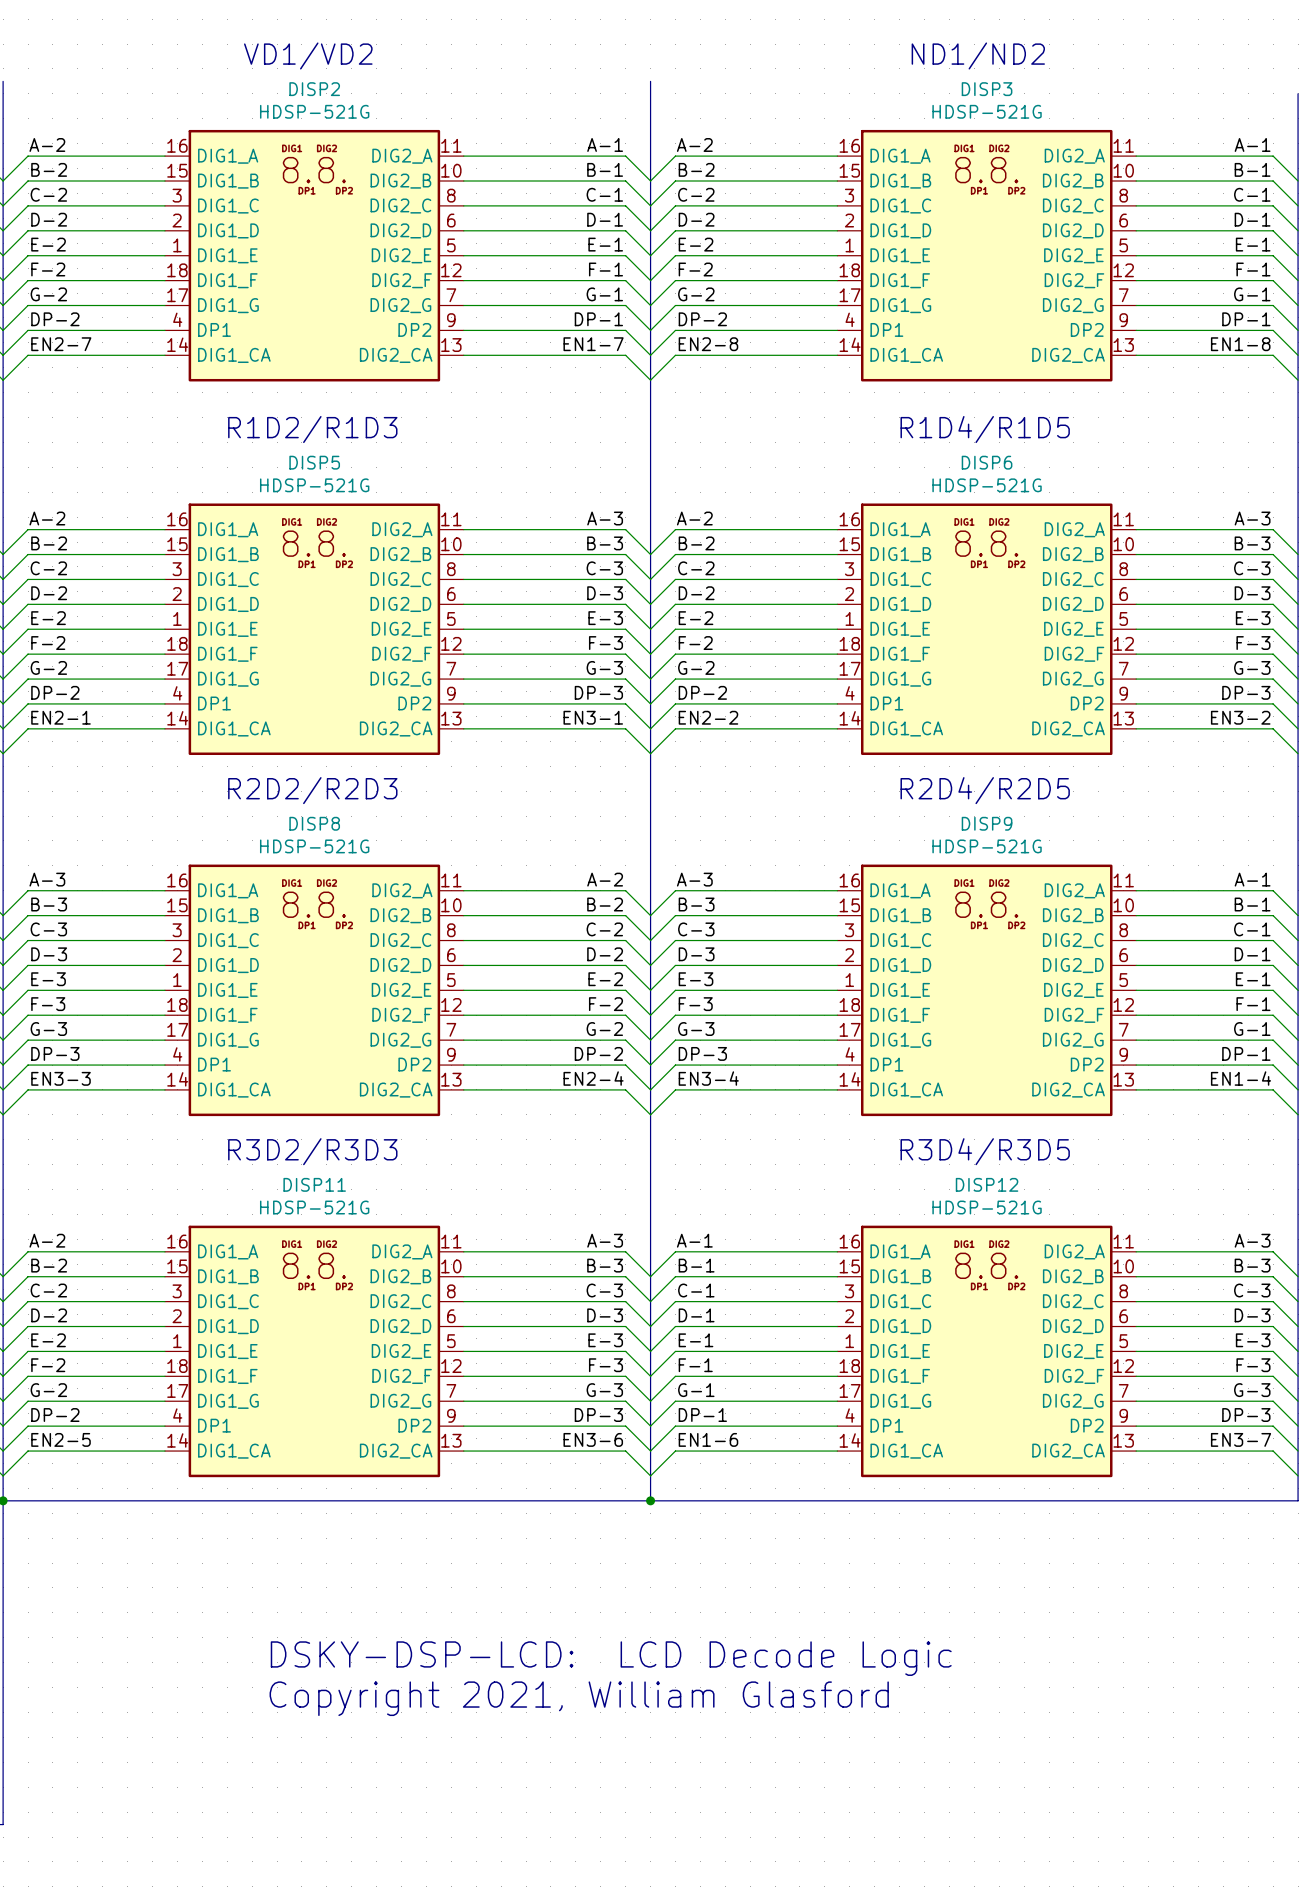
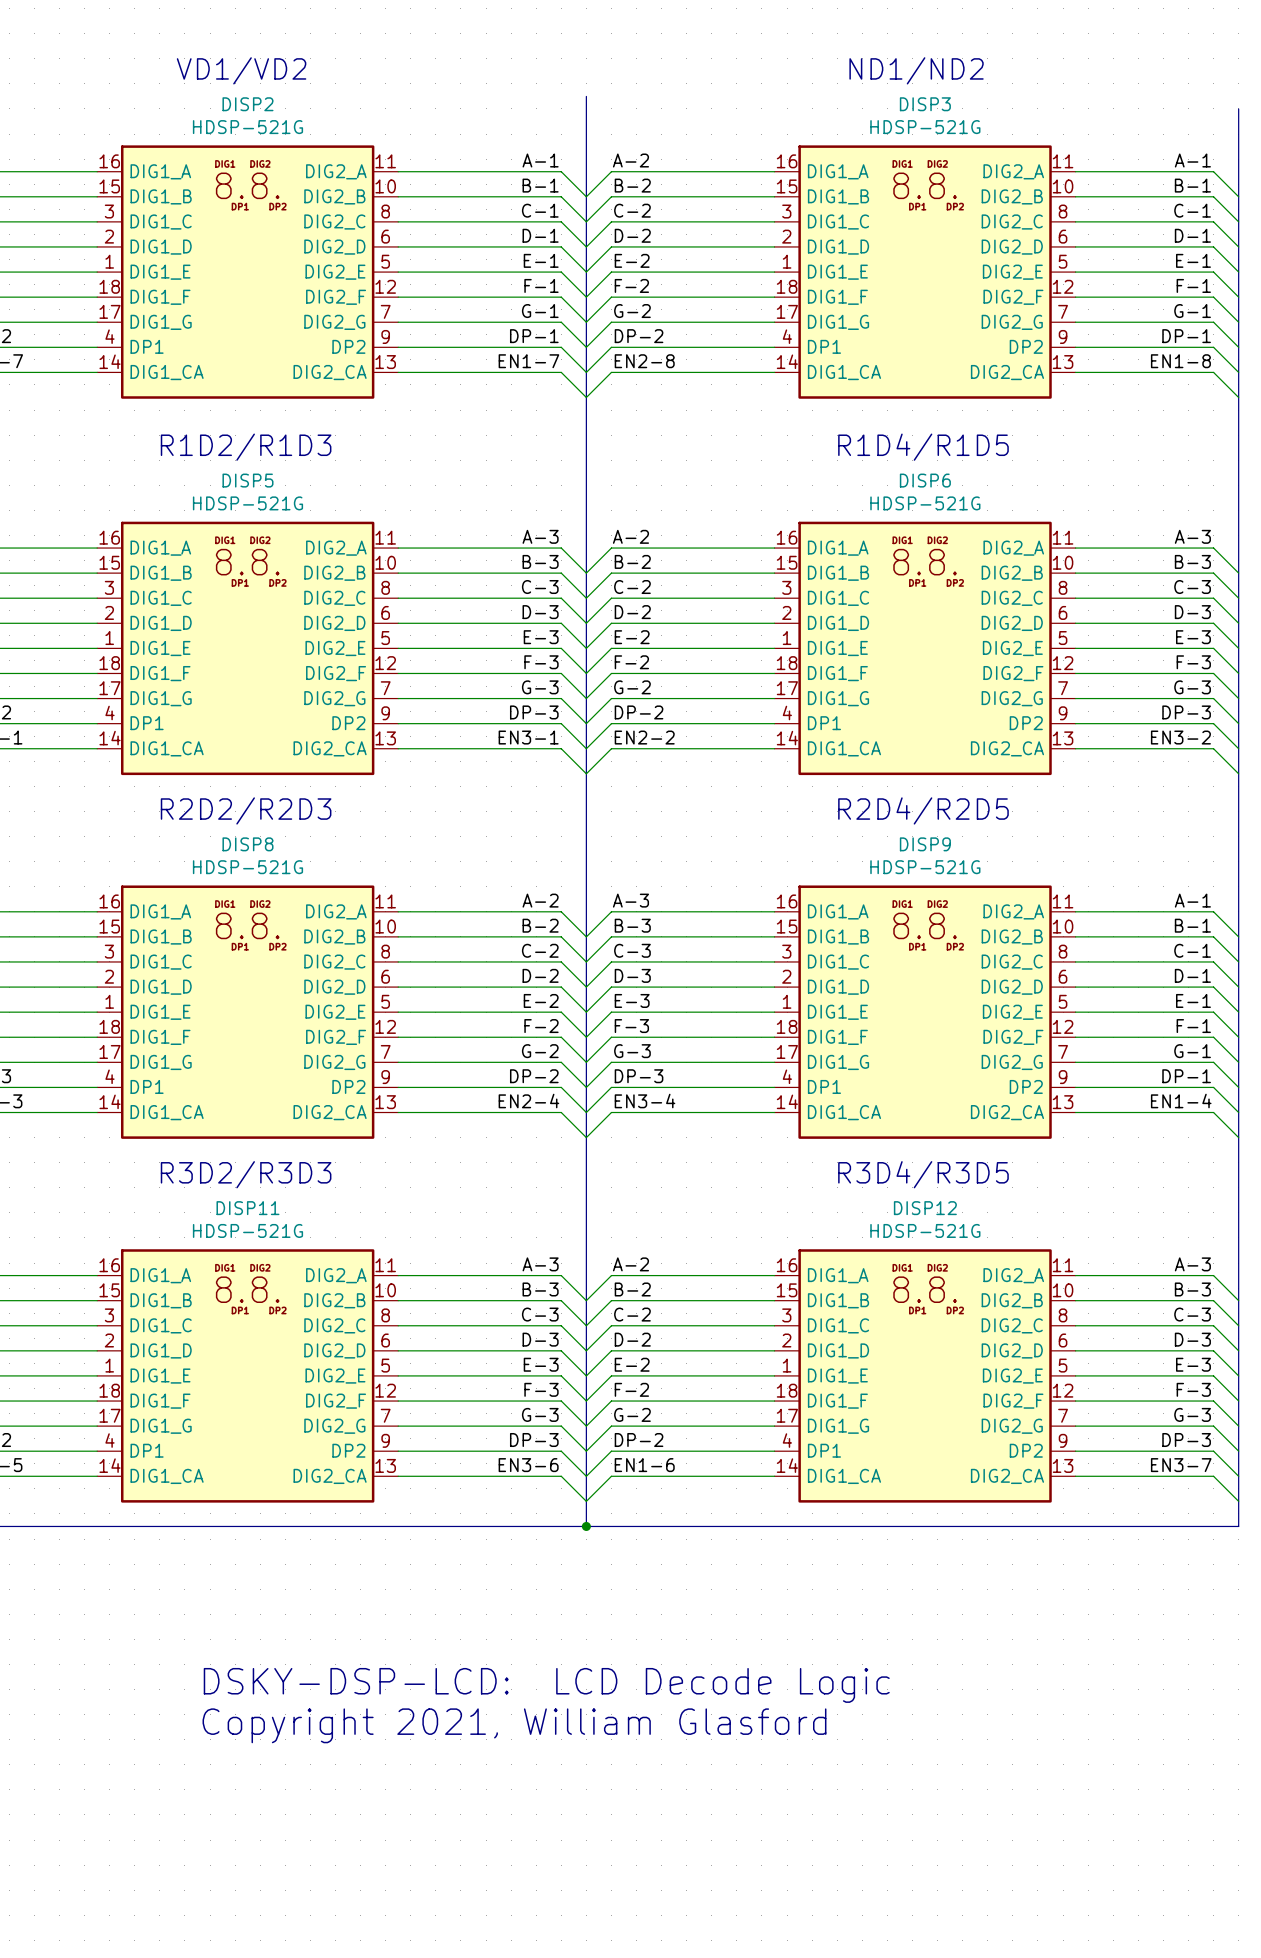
label: A-1 (694, 1240) -> A-2 (630, 1264)
label: B-1 (696, 1265) -> B-2 (632, 1289)
label: C-1 (696, 1290) -> C-2 (632, 1314)
label: D-1 (696, 1315) -> D-2 (632, 1339)
label: E-1 (696, 1340) -> E-2 (632, 1364)
label: F-1 (695, 1365) -> F-2 (631, 1389)
label: G-1 (696, 1390) -> G-2 (632, 1414)
label: DP-1 (702, 1415) -> DP-2 (639, 1440)

